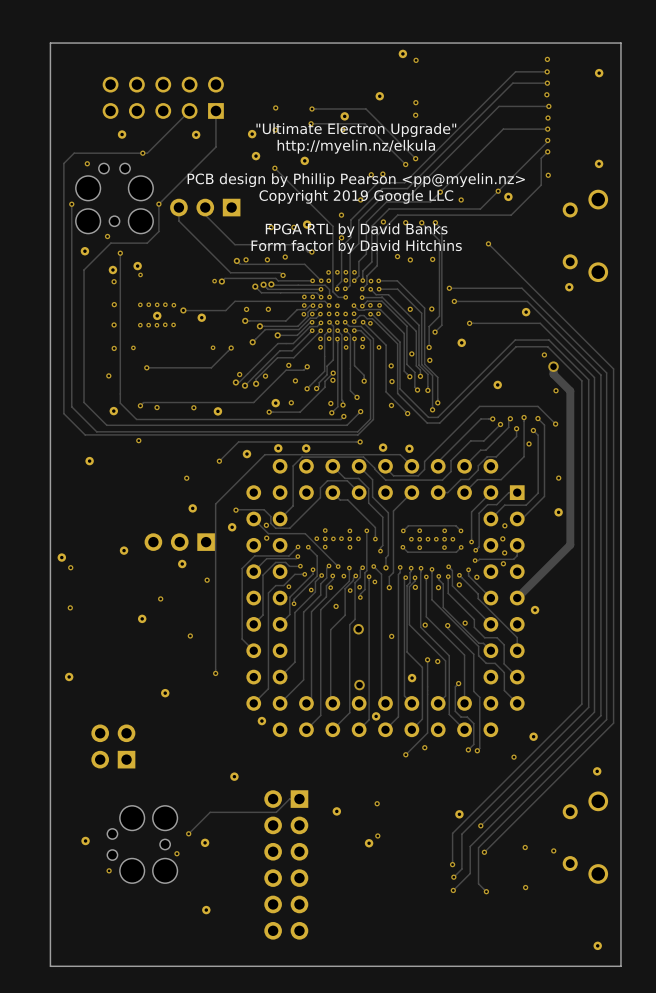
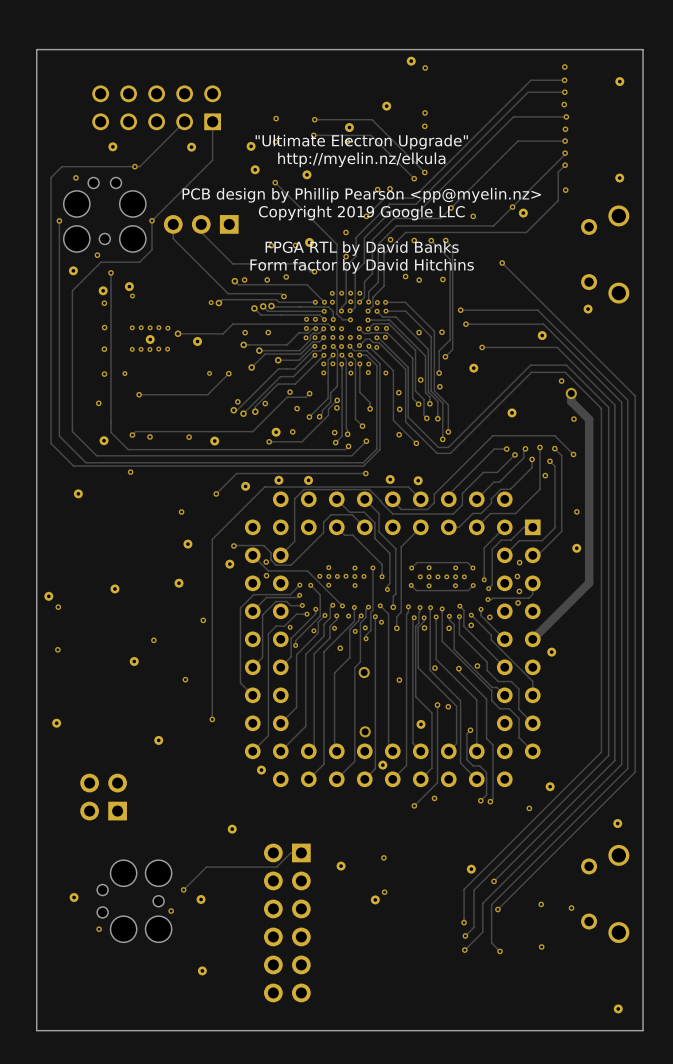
part footprint: [144, 533, 215, 551] -> [174, 578, 184, 588]
part: (182, 563) -> none

